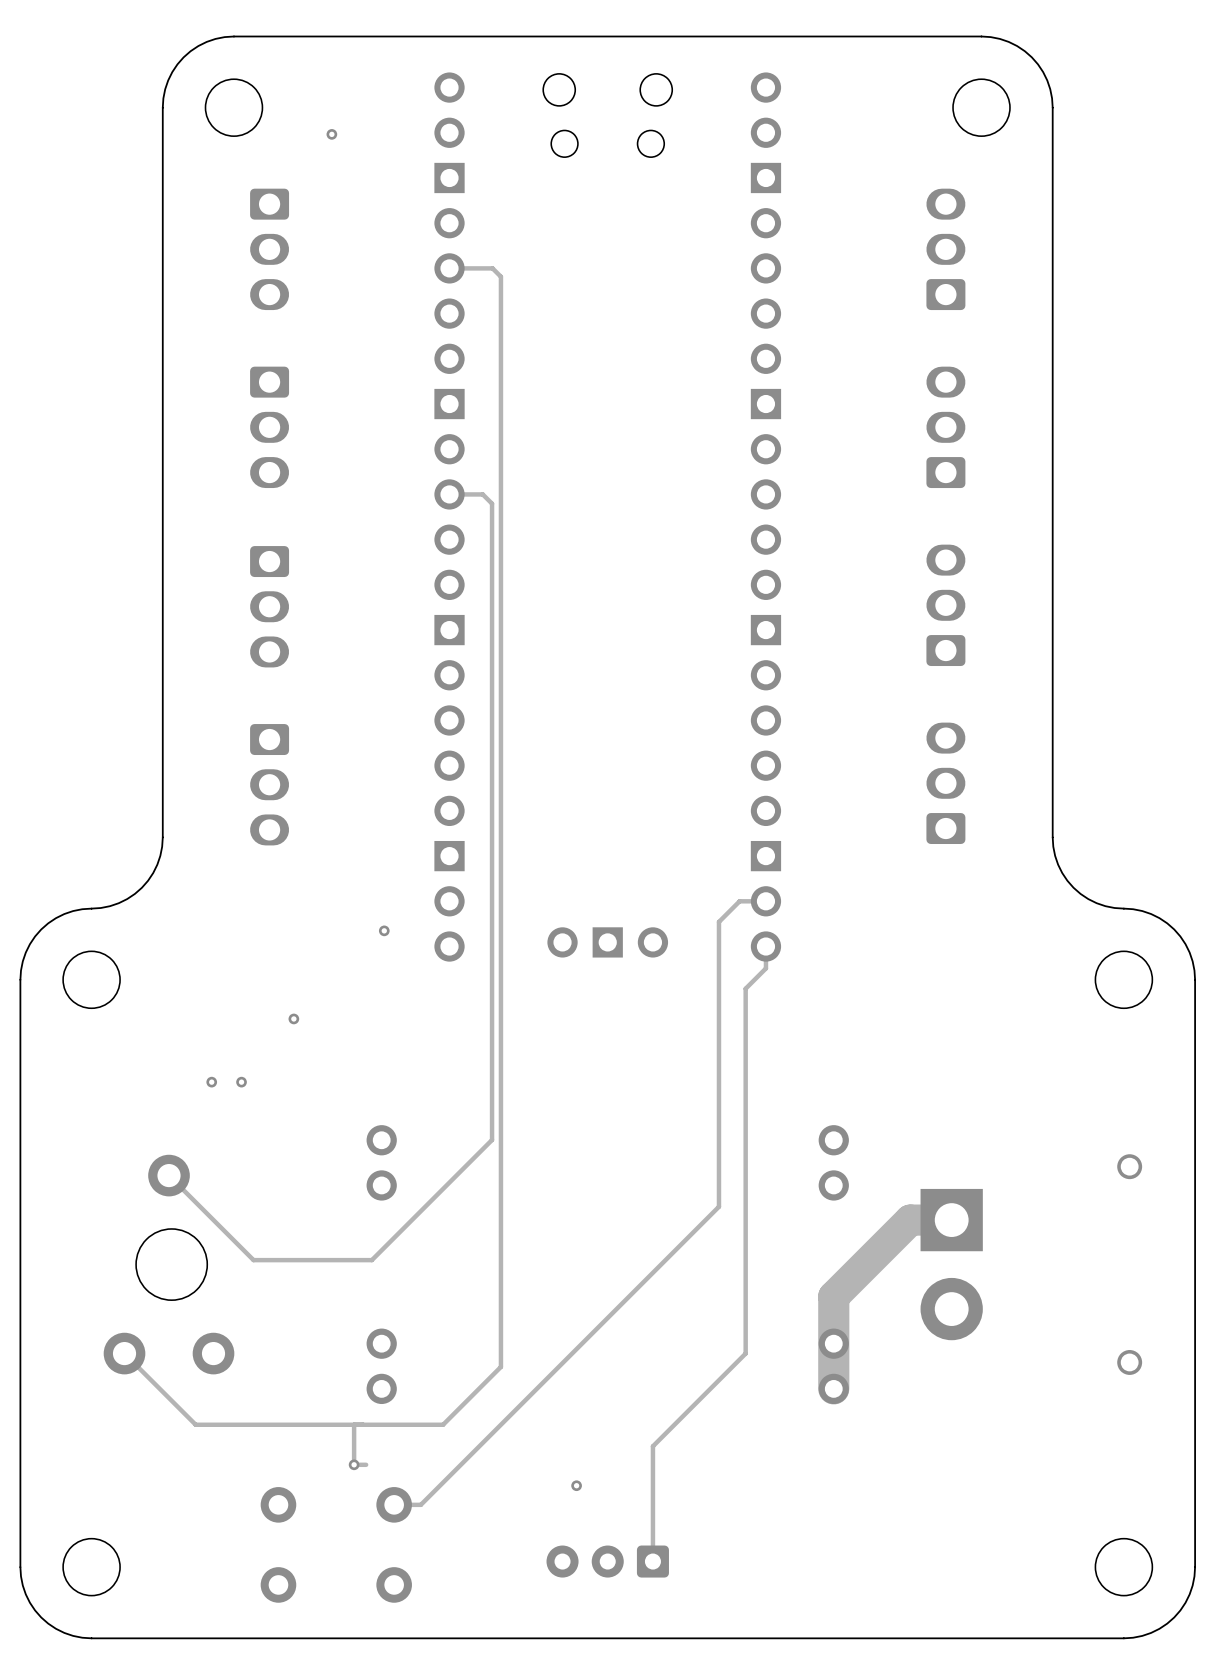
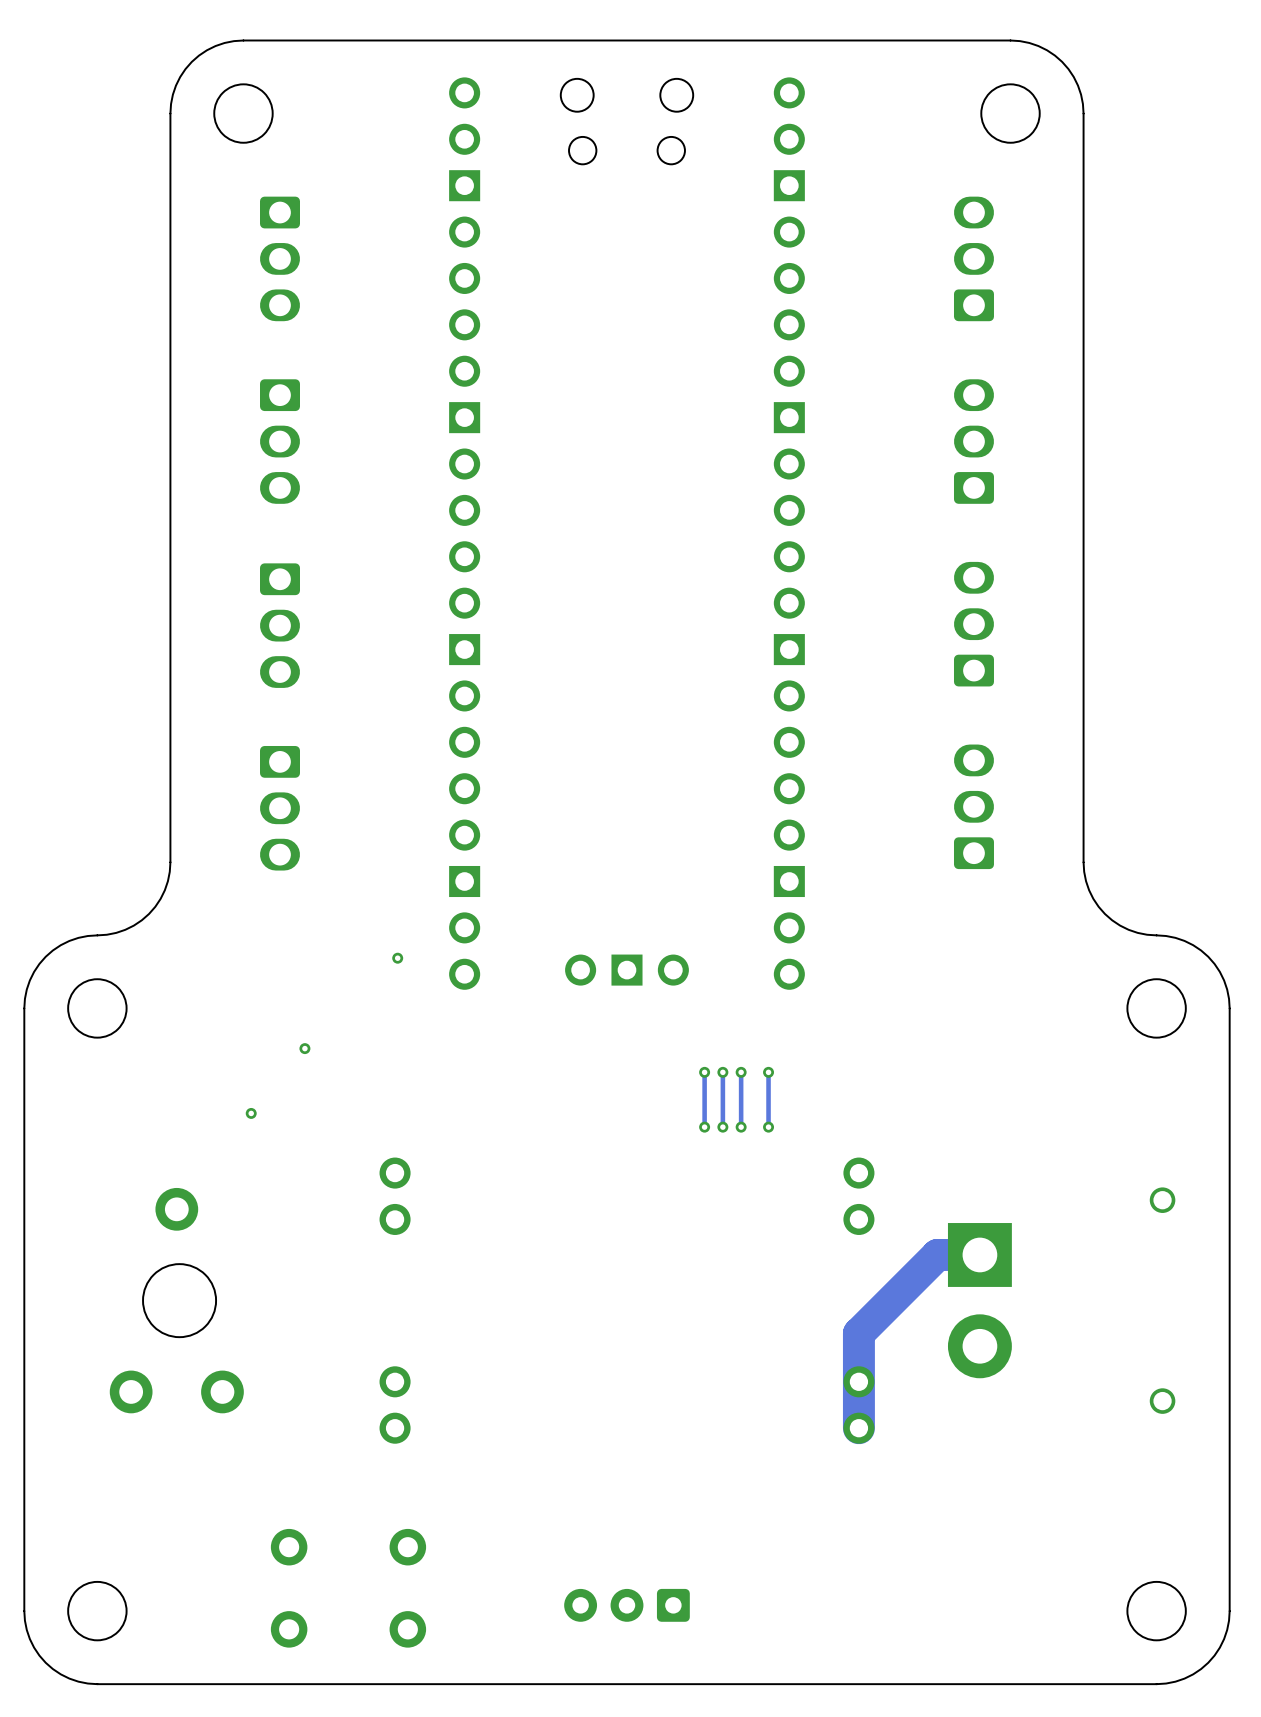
via: (331, 134) -> none
track: (449, 268) (492, 268) (500, 276) (500, 1366) (443, 1424) (195, 1424) (124, 1353) -> none
track: (449, 494) (482, 494) (492, 503) (492, 1139) (371, 1260) (253, 1260) (169, 1175) -> none
track: (765, 901) (739, 901) (718, 921) (718, 1042) -> none
track: (765, 946) (765, 968) (745, 988) (745, 1042) -> none
track: none -> (704, 1072) (704, 1127)
via: none -> (704, 1072)
track: none -> (722, 1072) (722, 1127)
via: none -> (722, 1072)
via: none -> (741, 1072)
via: none -> (768, 1072)
via: (211, 1082) -> none
via: none -> (704, 1127)
via: none -> (722, 1127)
track: (718, 1095) (718, 1206) (420, 1504) (394, 1504) -> none
via: none -> (741, 1127)
track: (745, 1095) (745, 1353) (652, 1446) (652, 1561) -> none
via: none -> (768, 1127)
track: (354, 1424) (354, 1464) (366, 1464) -> none
via: (354, 1464) -> none
via: (576, 1485) -> none

